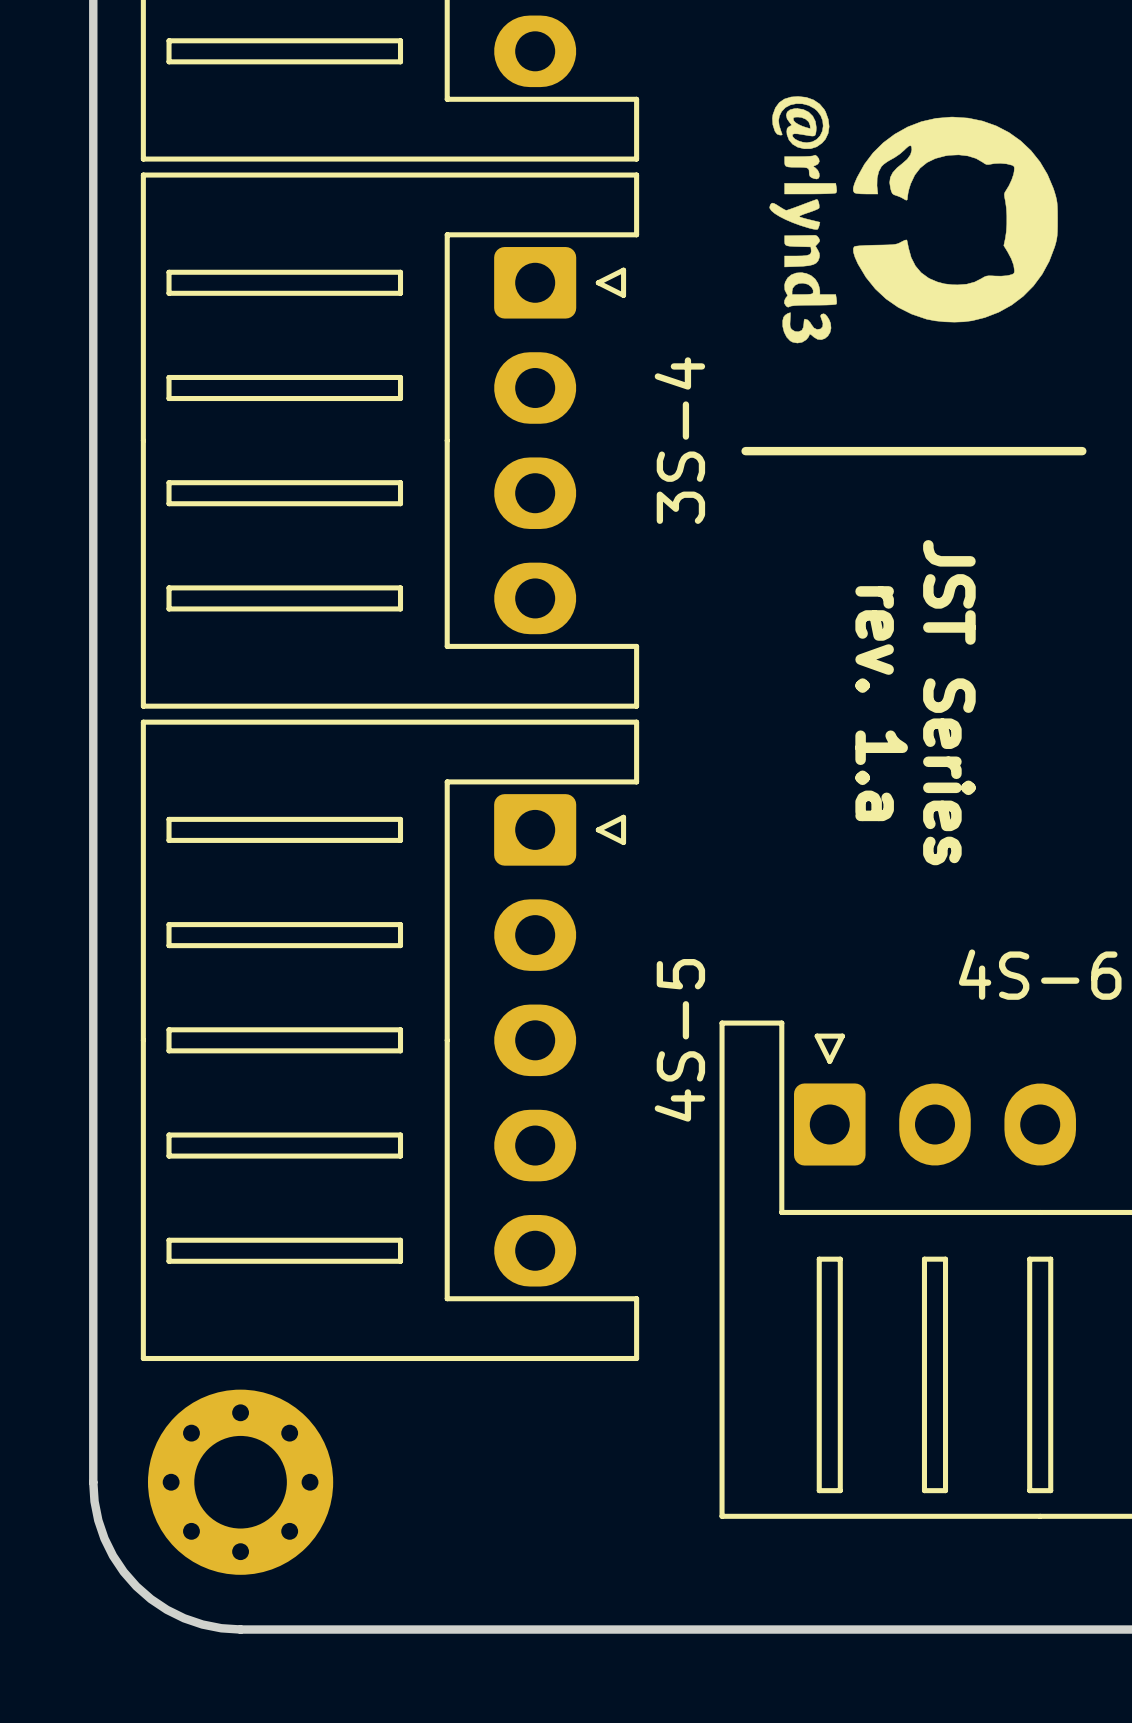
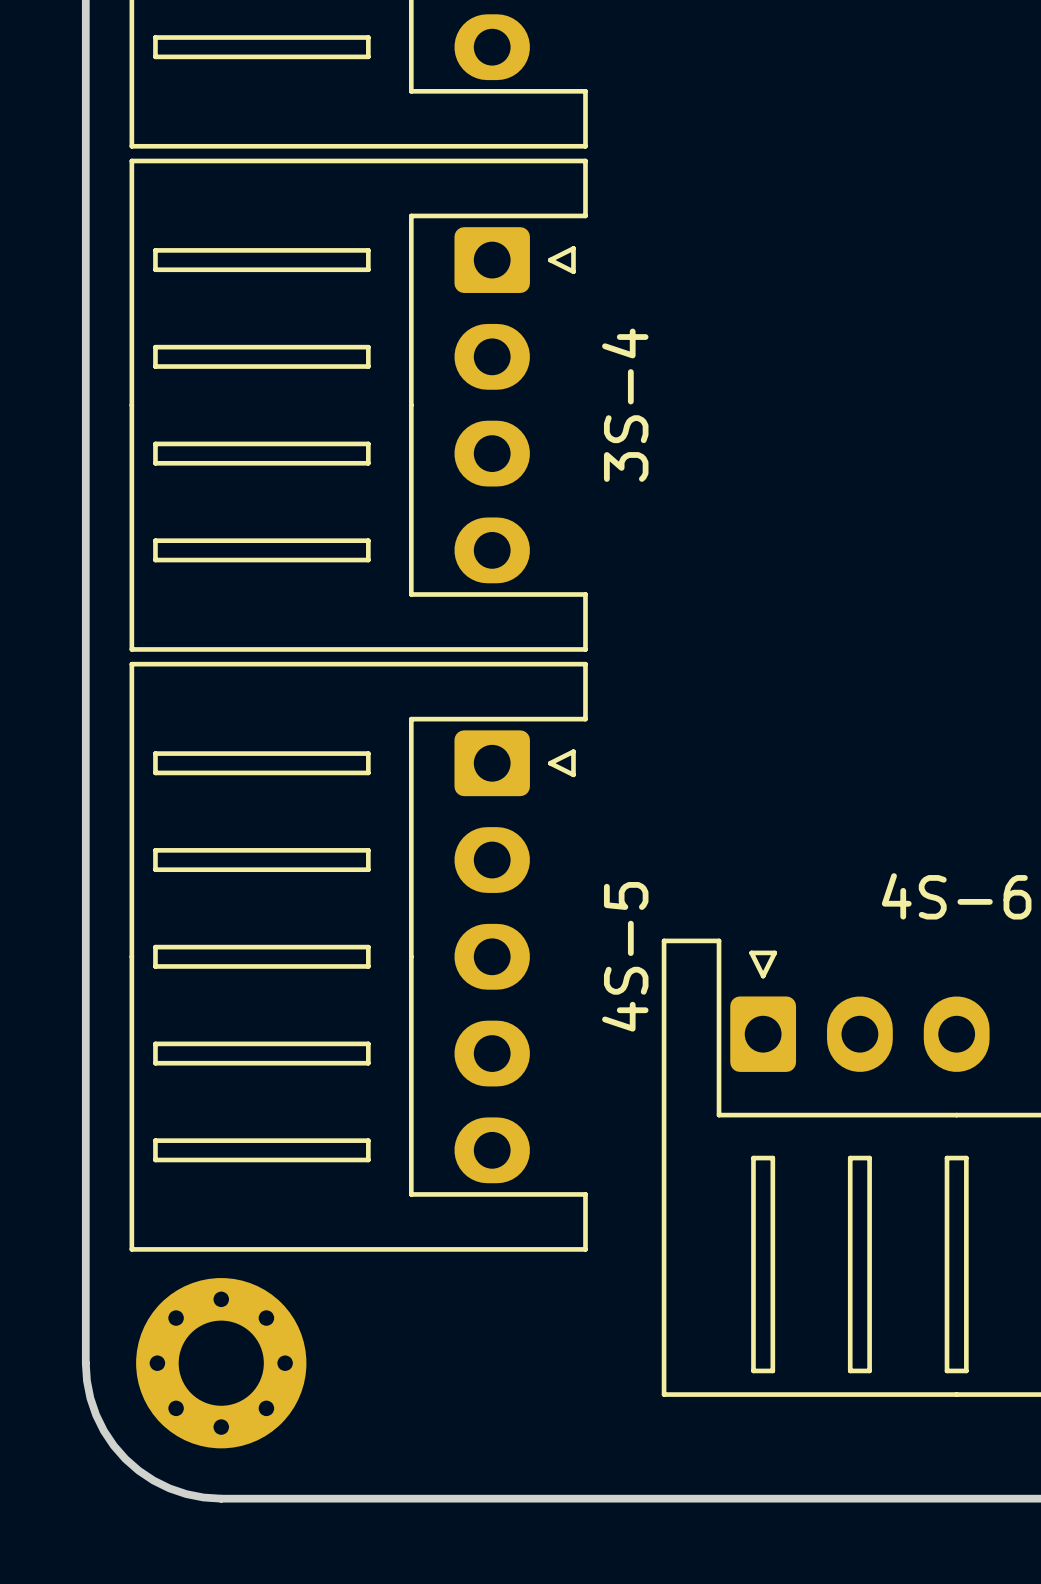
drawing: [769, 96, 1058, 344] -> none
line: (745, 451) (1082, 451) -> none
text: JST Series (949, 702) -> none
text: rev. 1.a (881, 703) -> none

